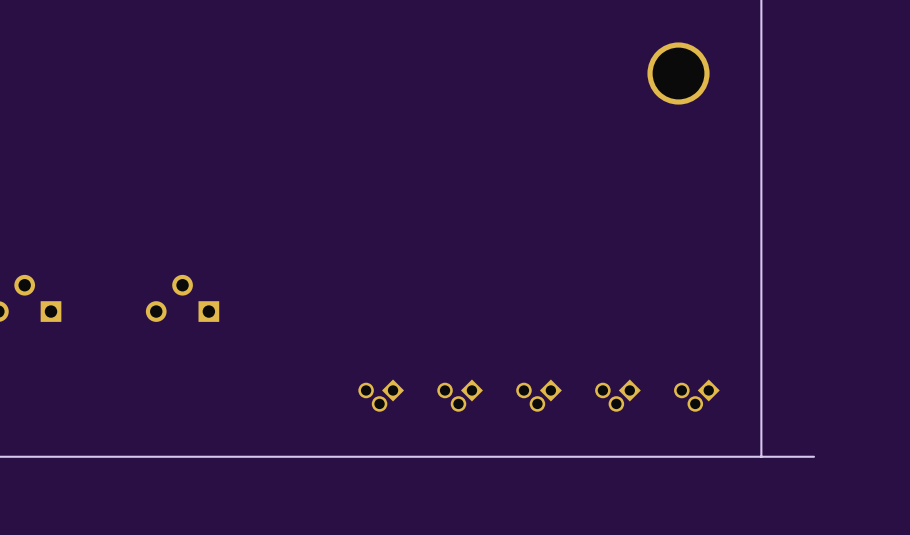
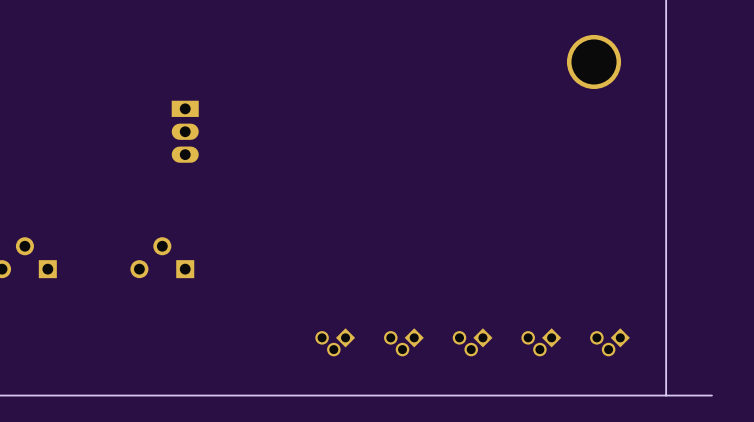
part: none -> (185, 131)

